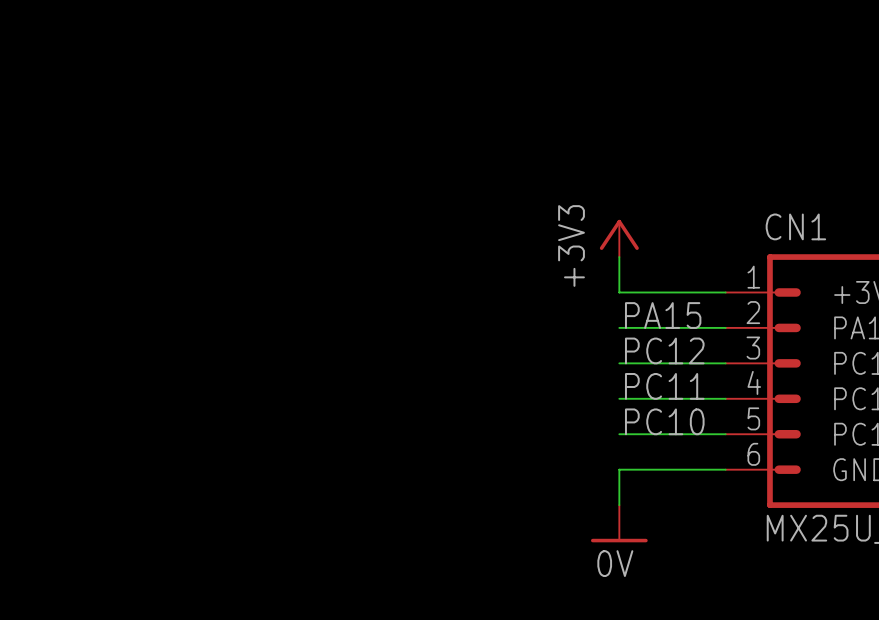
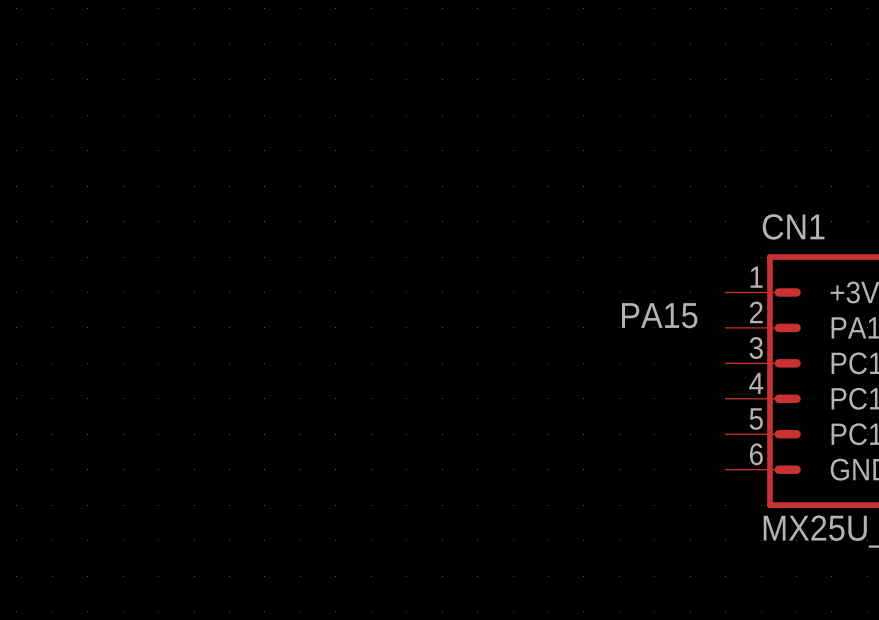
power symbol: +3V3 (619, 238) -> none
wire: (619, 257) (619, 292) (725, 292) -> none
wire: (619, 327) (725, 327) -> none
label: PC12 (664, 350) -> none
wire: (619, 363) (725, 363) -> none
label: PC11 (664, 386) -> none
wire: (619, 398) (725, 398) -> none
label: PC10 (664, 421) -> none
wire: (619, 434) (725, 434) -> none
wire: (725, 469) (619, 469) (619, 505) -> none
power symbol: 0V (619, 523) -> none

